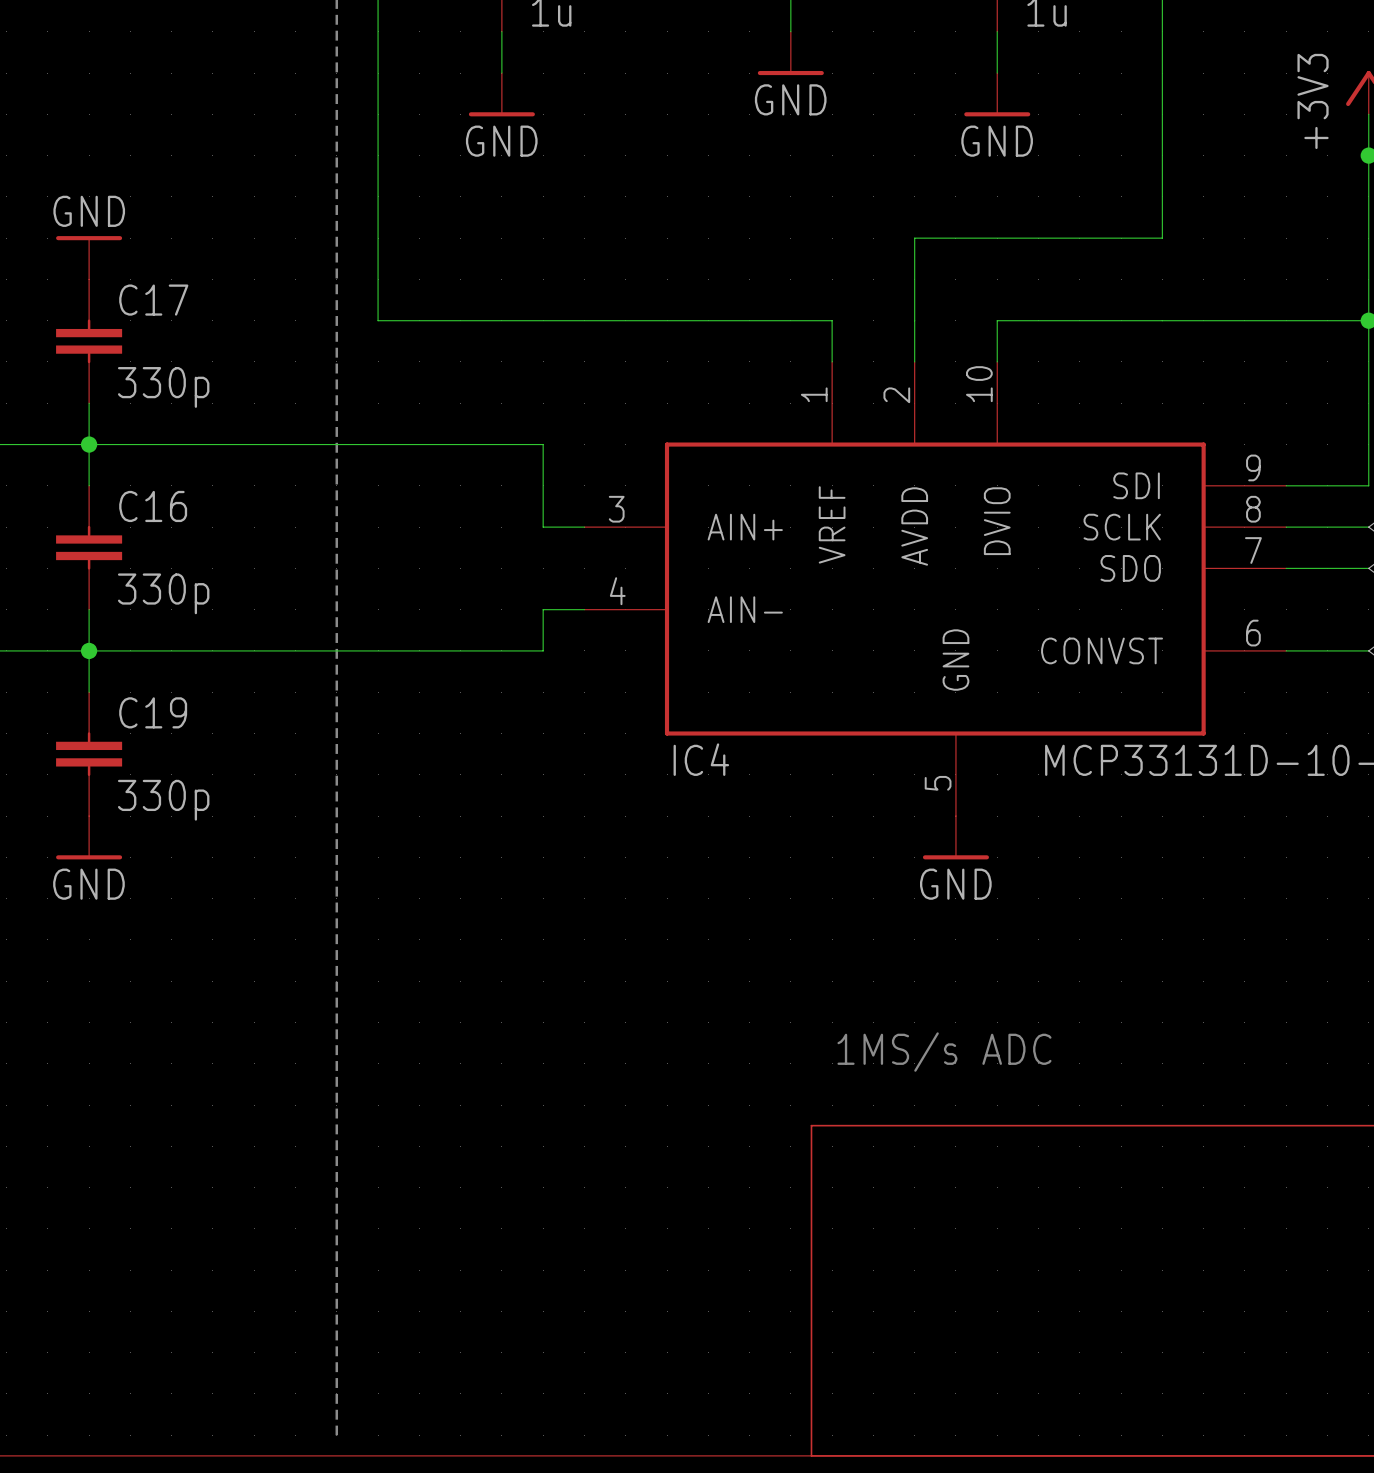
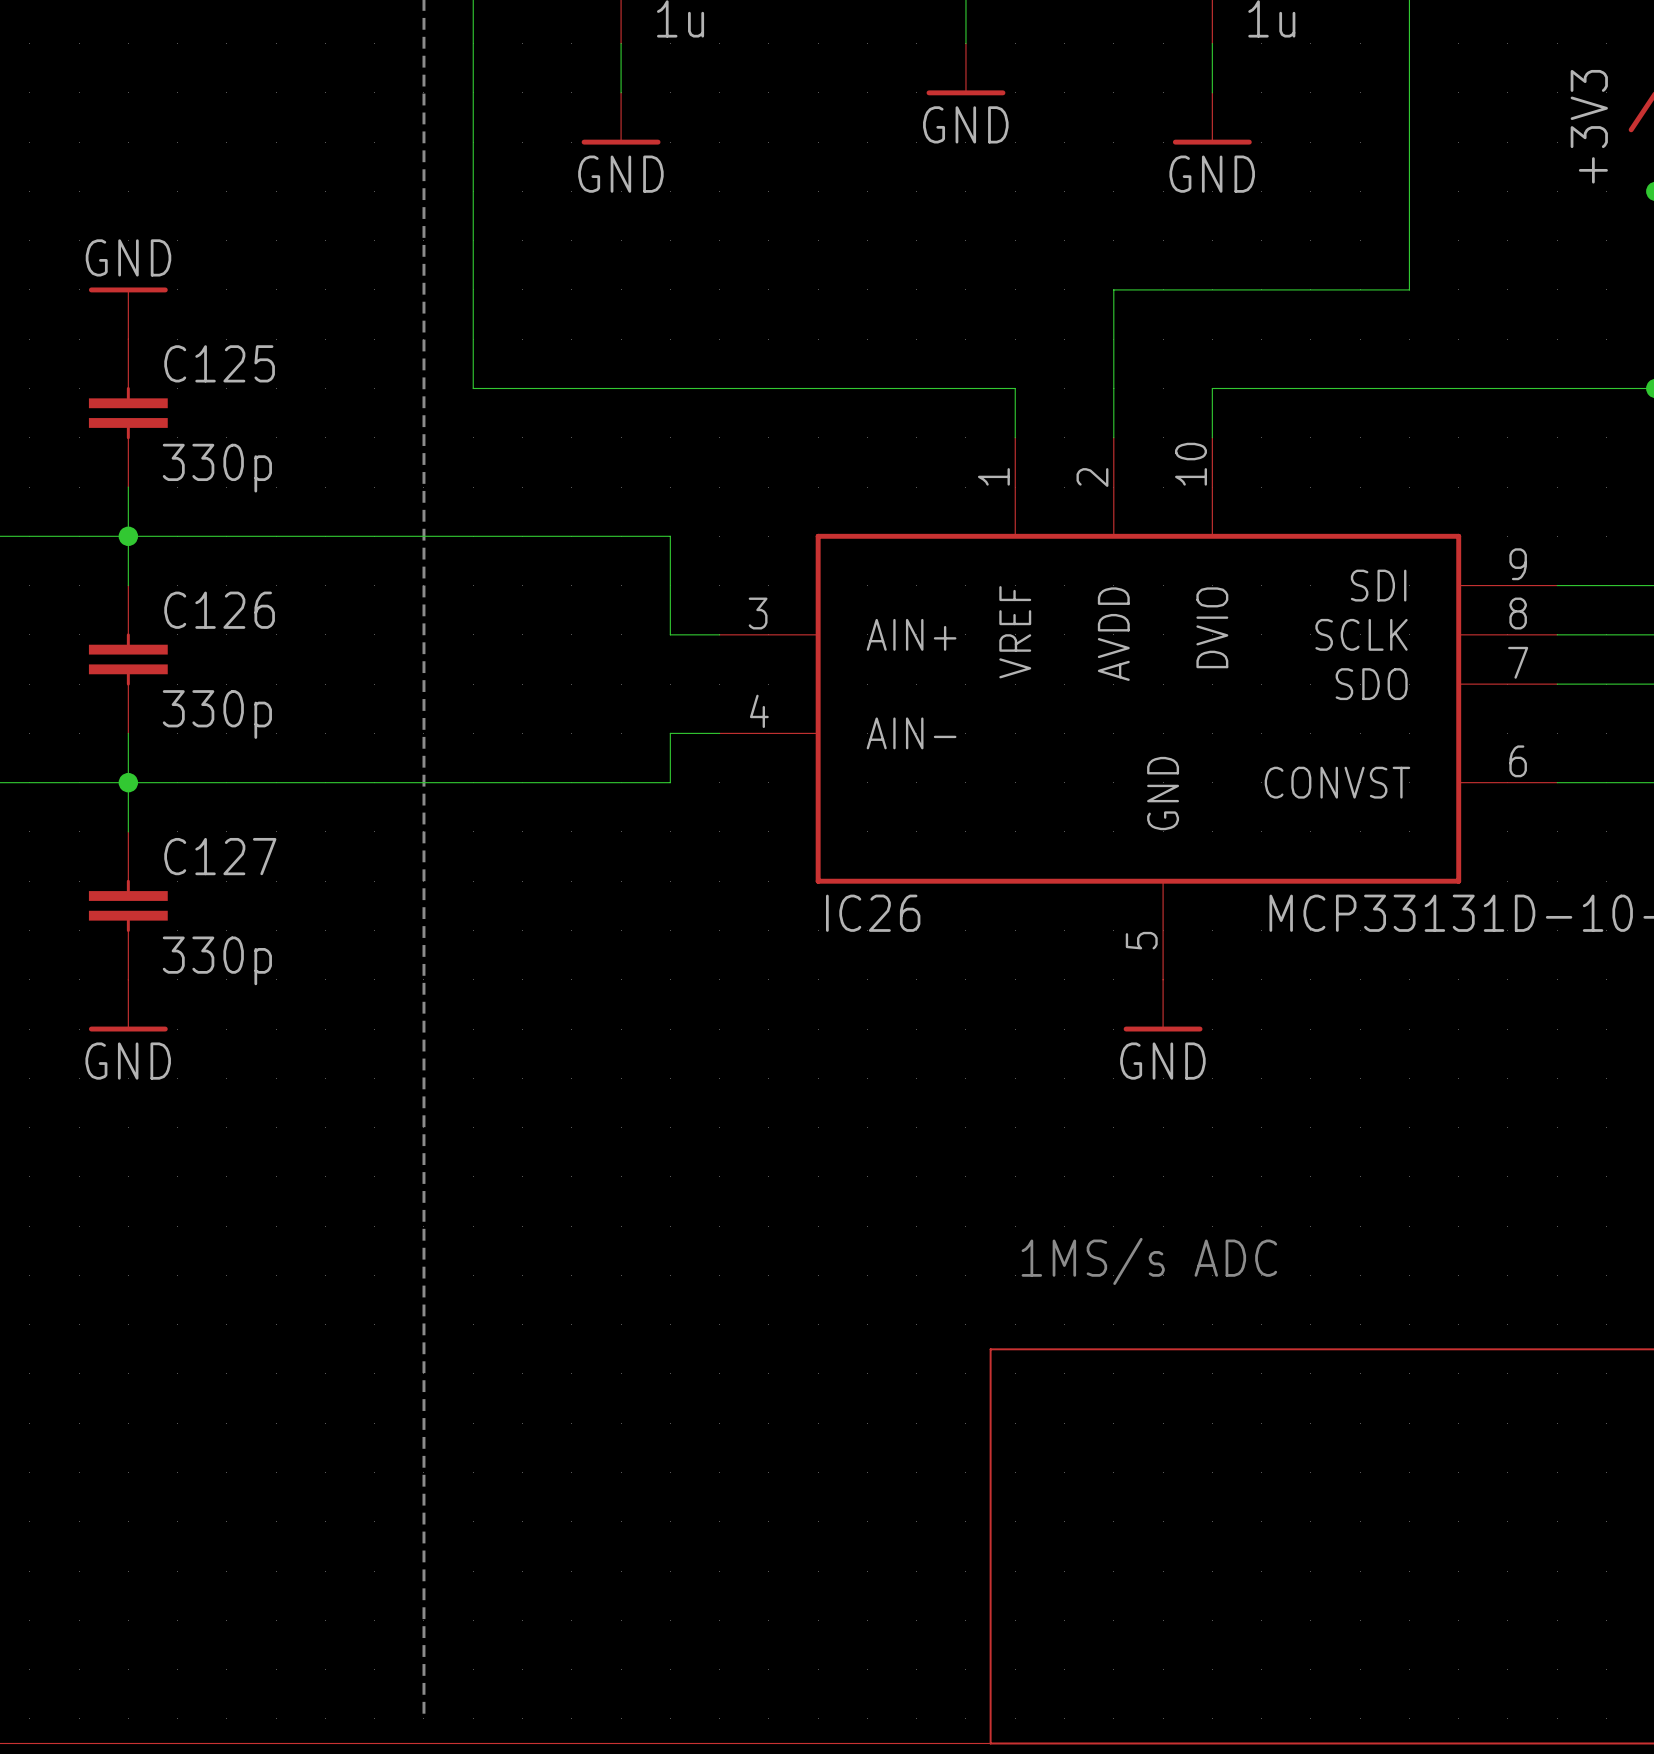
C17 name: C17 (153, 300) -> C125 (219, 363)
C16 name: C16 (153, 506) -> C126 (219, 610)
C19 name: C19 (153, 712) -> C127 (220, 856)
IC4 name: IC4 (701, 759) -> IC26 (873, 913)

